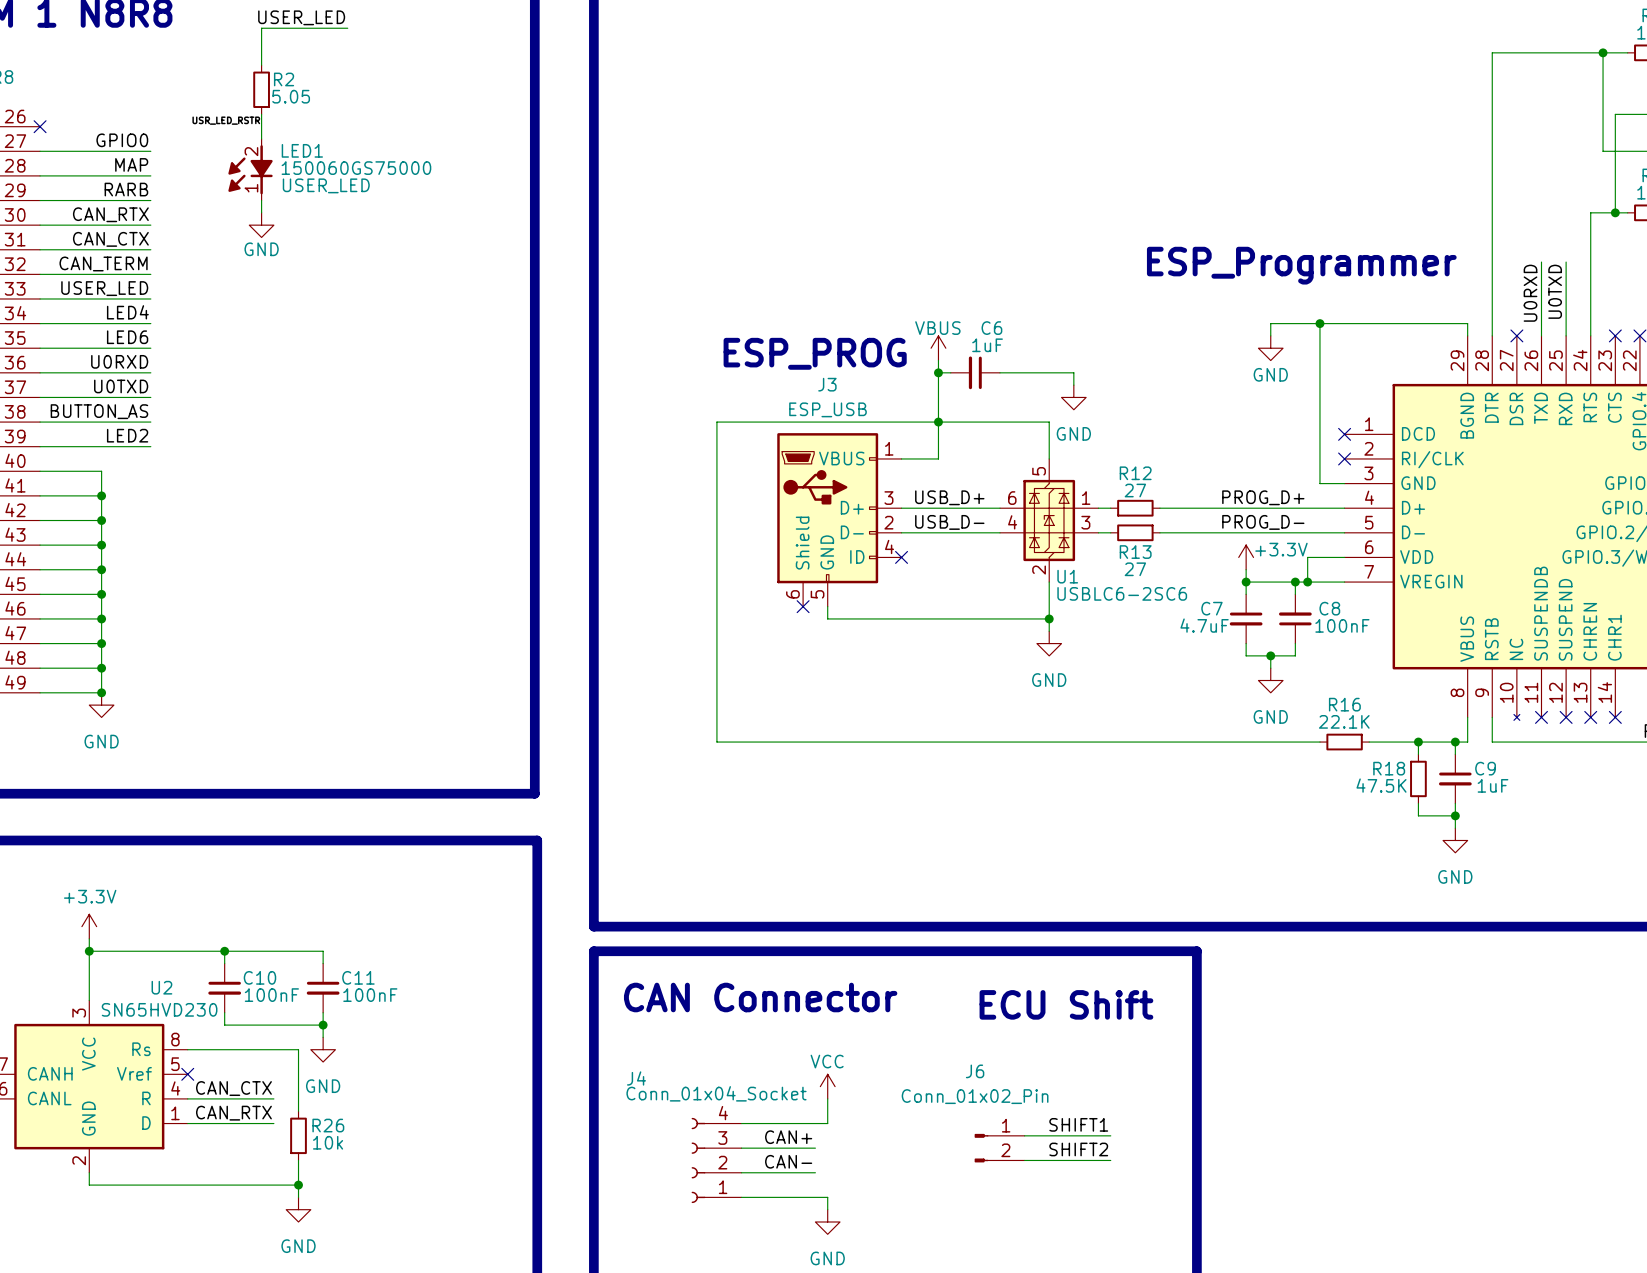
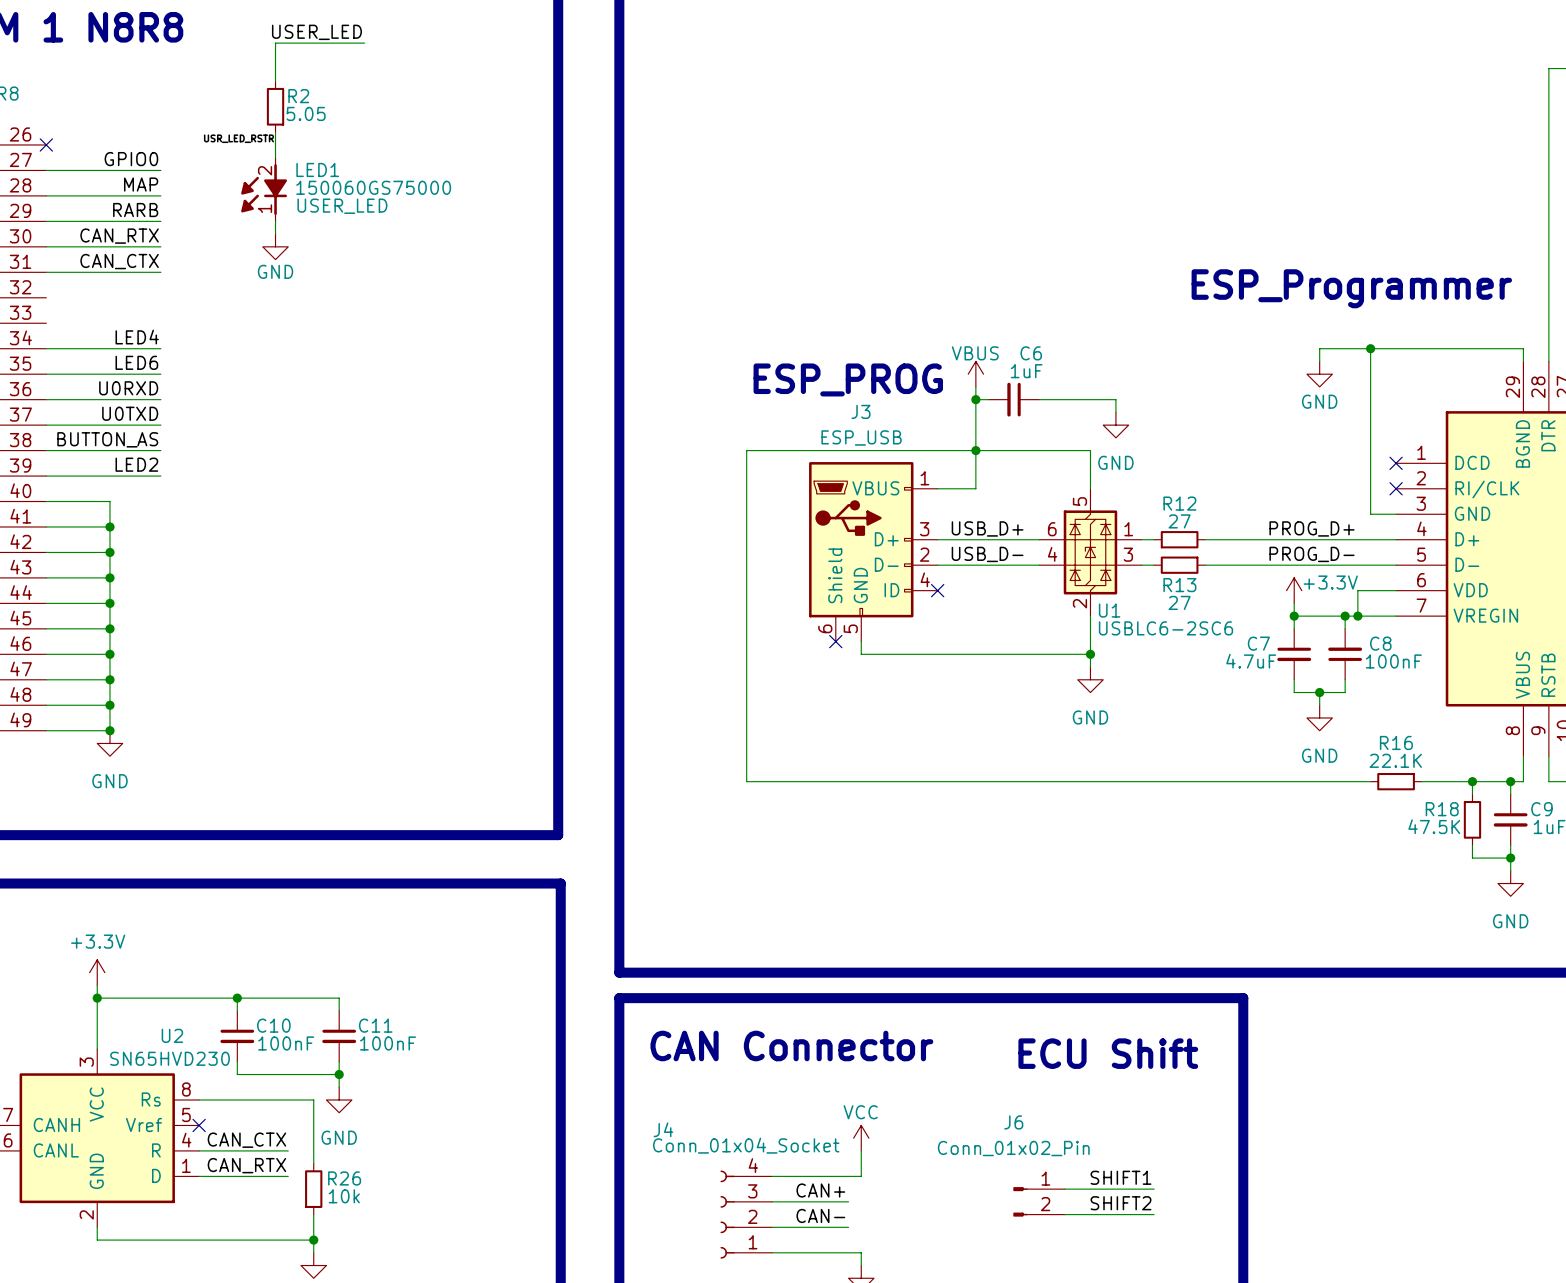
label: CAN_TERM (103, 263) -> none
wire: (40, 274) (150, 274) -> none
label: USER_LED (104, 288) -> none
wire: (40, 298) (150, 298) -> none

